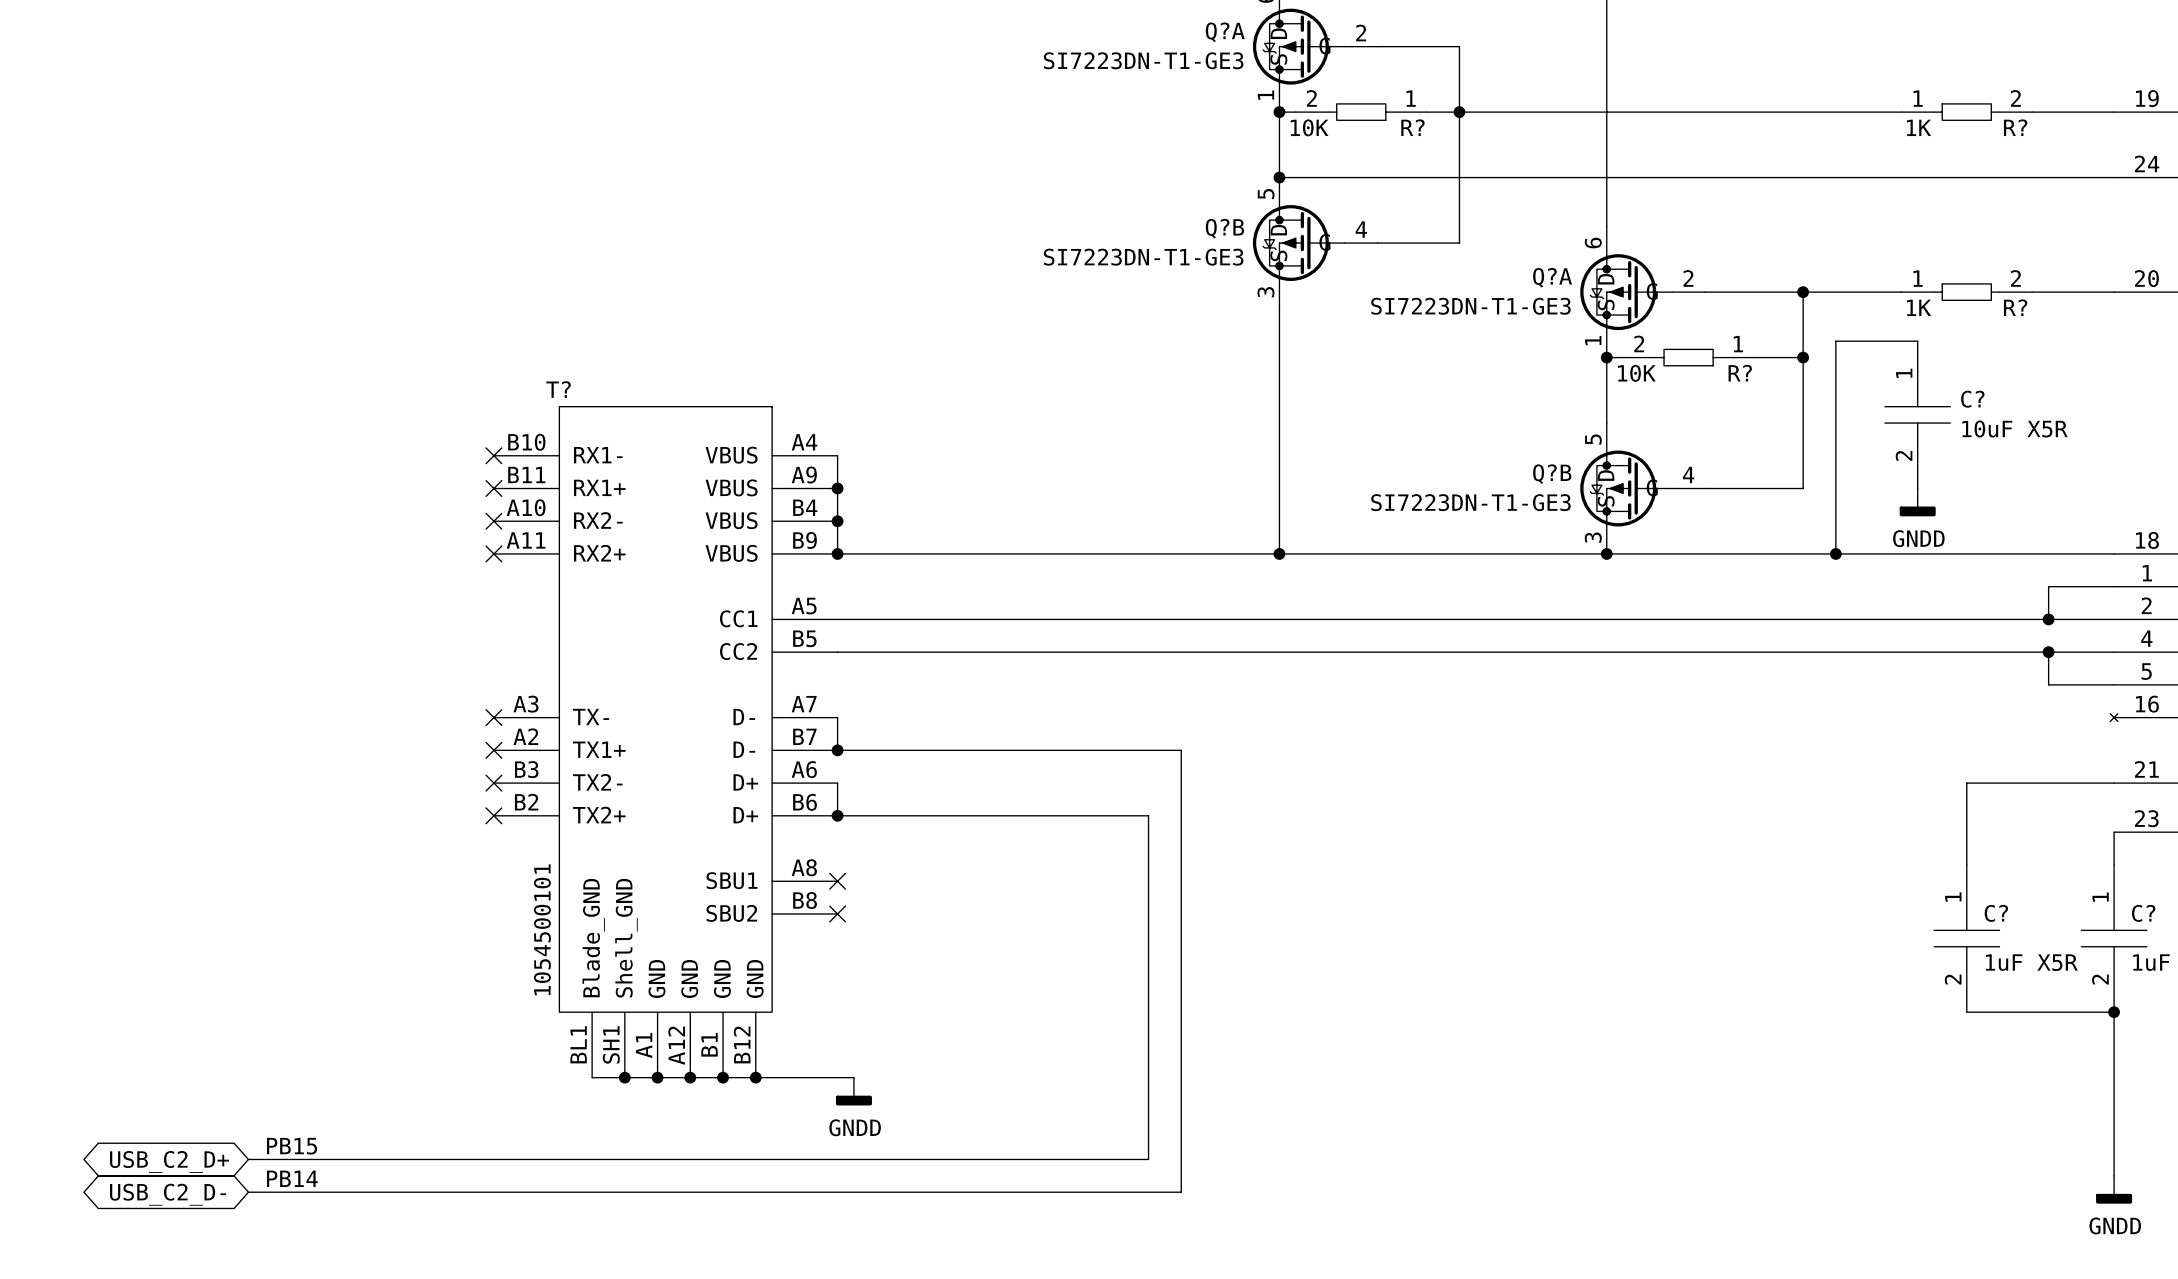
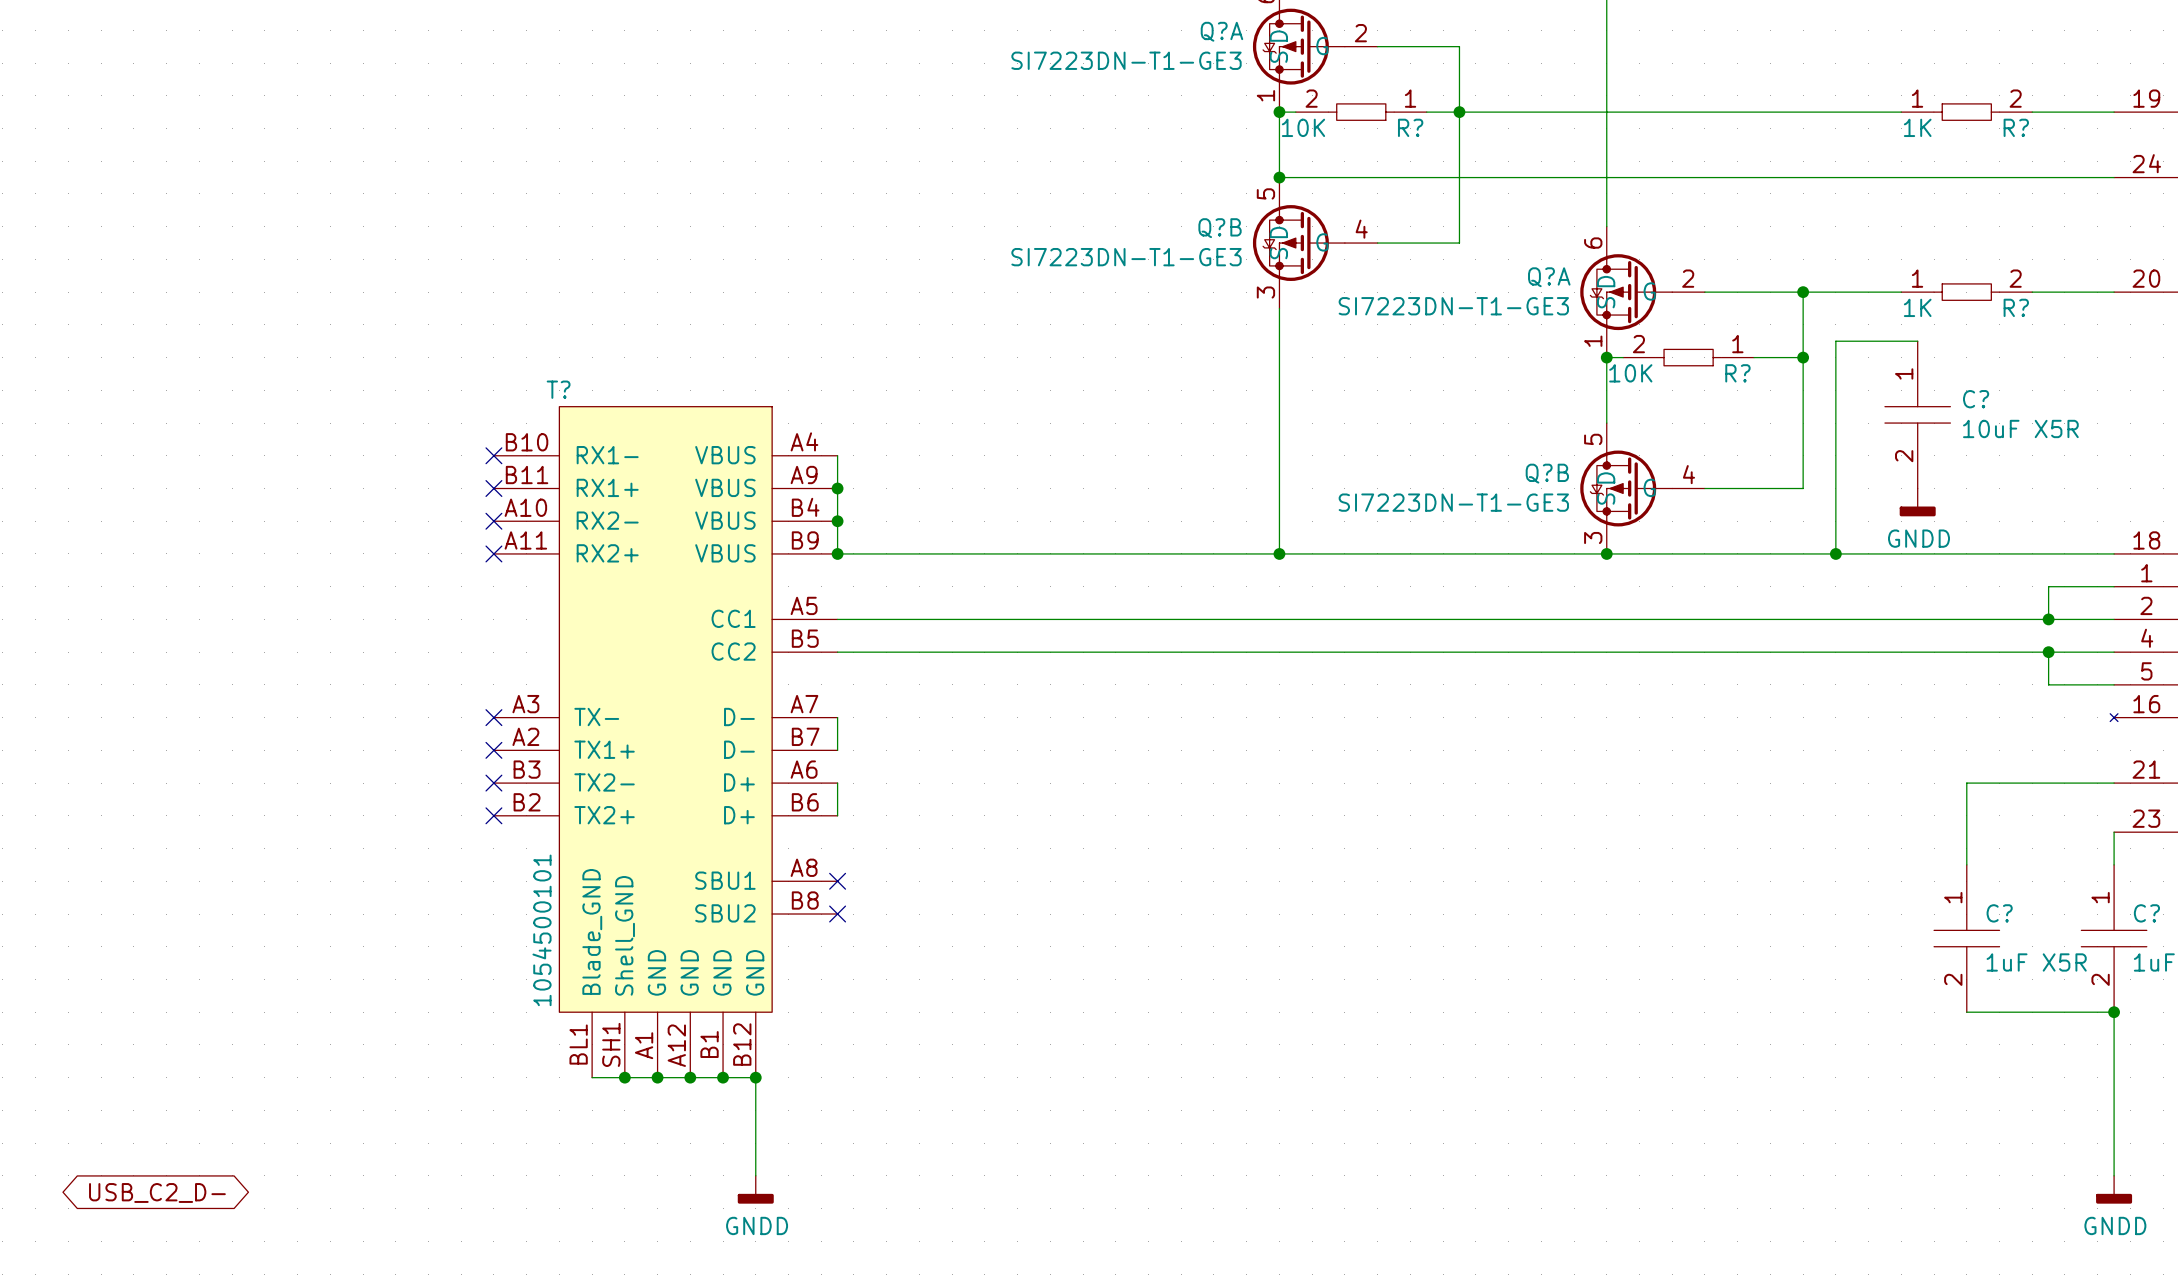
wire: (837, 750) (1181, 750) (1181, 1192) (248, 1192) -> none
junction: (837, 750) -> none
wire: (837, 815) (1148, 815) (1148, 1159) (248, 1159) -> none
junction: (837, 815) -> none
wire: (755, 1077) (853, 1077) -> (755, 1077) (755, 1175)
power symbol position: GNDD (853, 1091) -> GNDD (755, 1189)
text: PB15 (292, 1146) -> none
global label: USB_C2_D+ (169, 1161) -> none
text: PB14 (292, 1178) -> none

